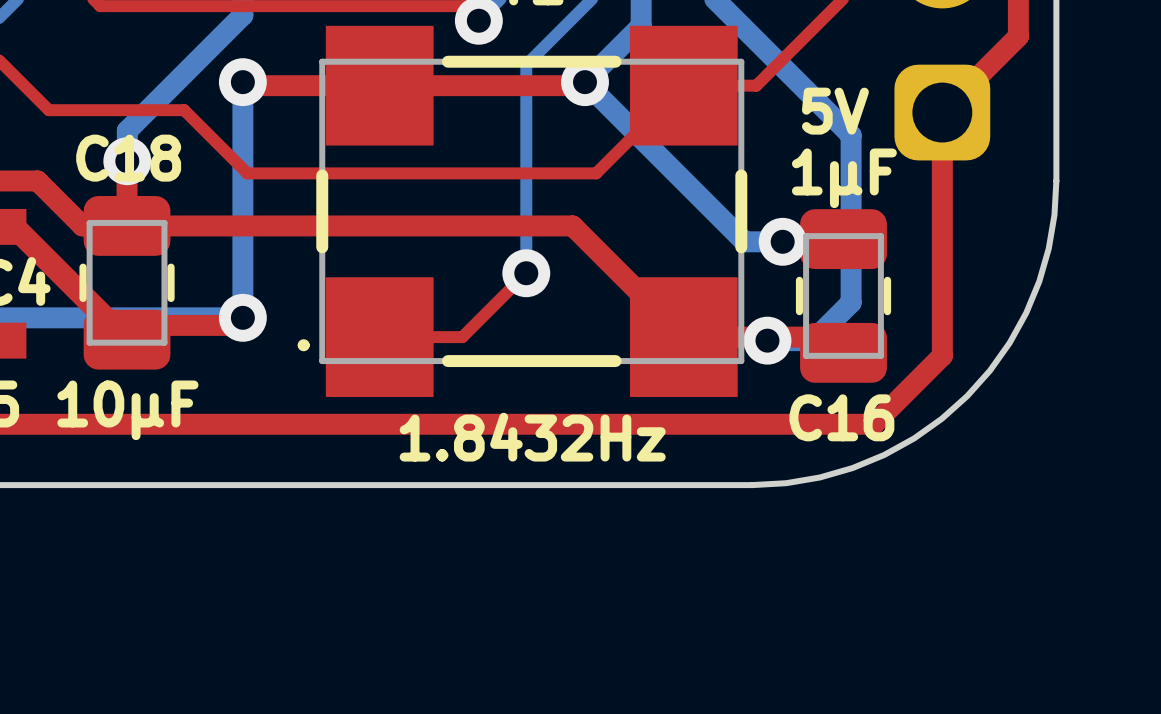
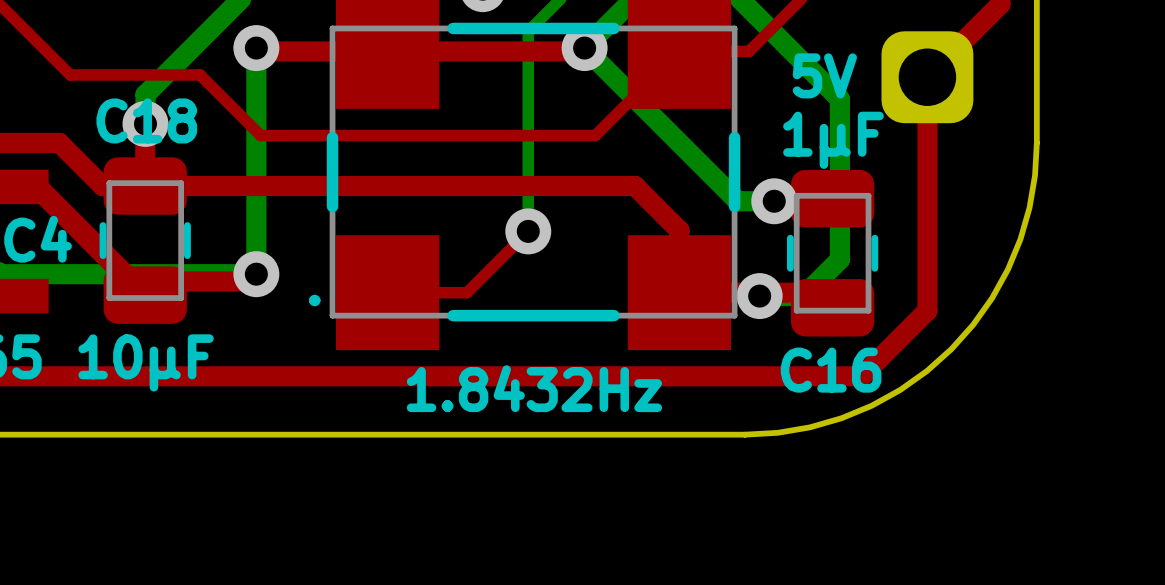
top track: (572, 225) (683, 337) -> (572, 186) (635, 186) (679, 230) (679, 292)

